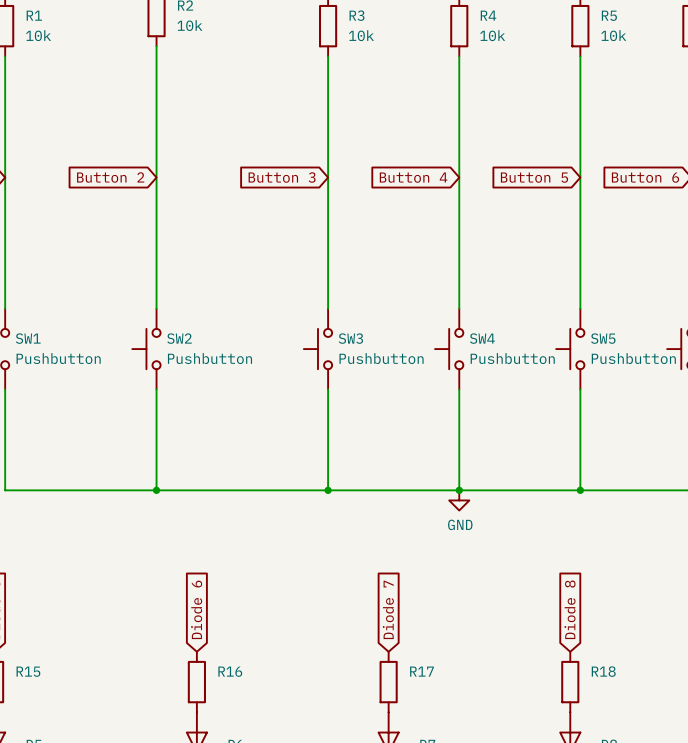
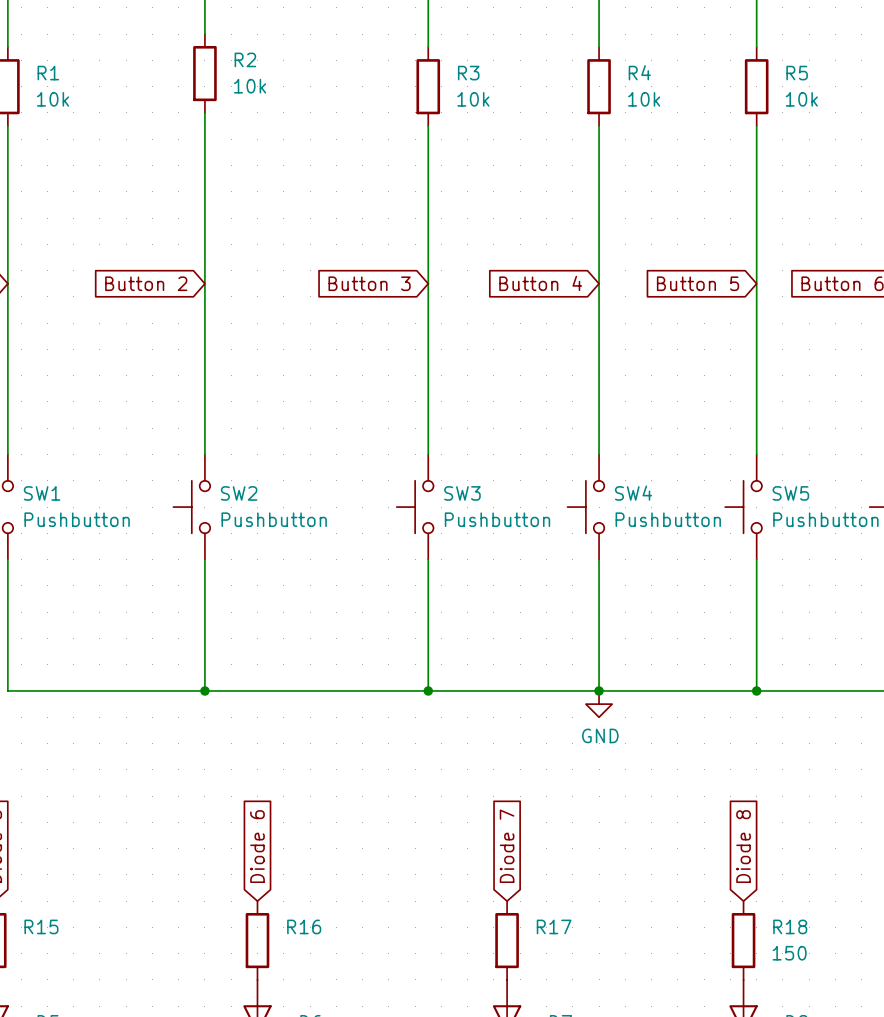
R18 value: none -> 150 (789, 953)

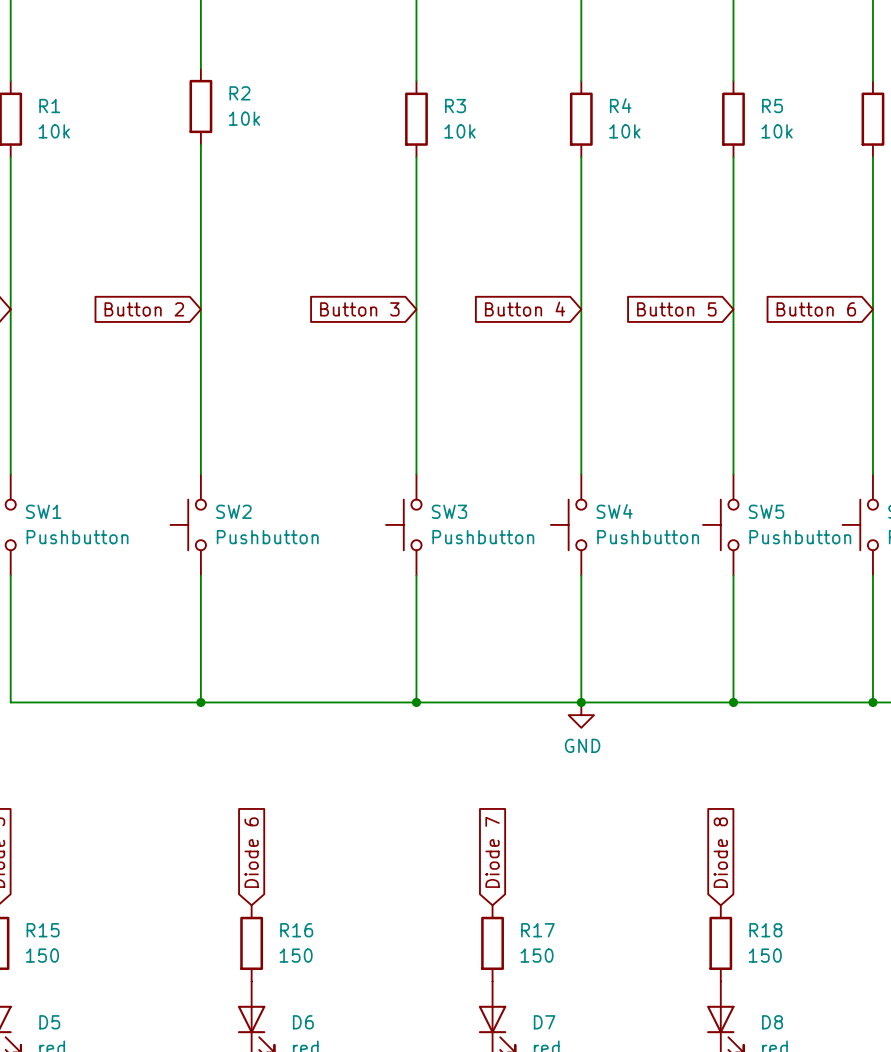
R15 value: none -> 150 (42, 955)
R16 value: none -> 150 (296, 955)
R17 value: none -> 150 (537, 955)

